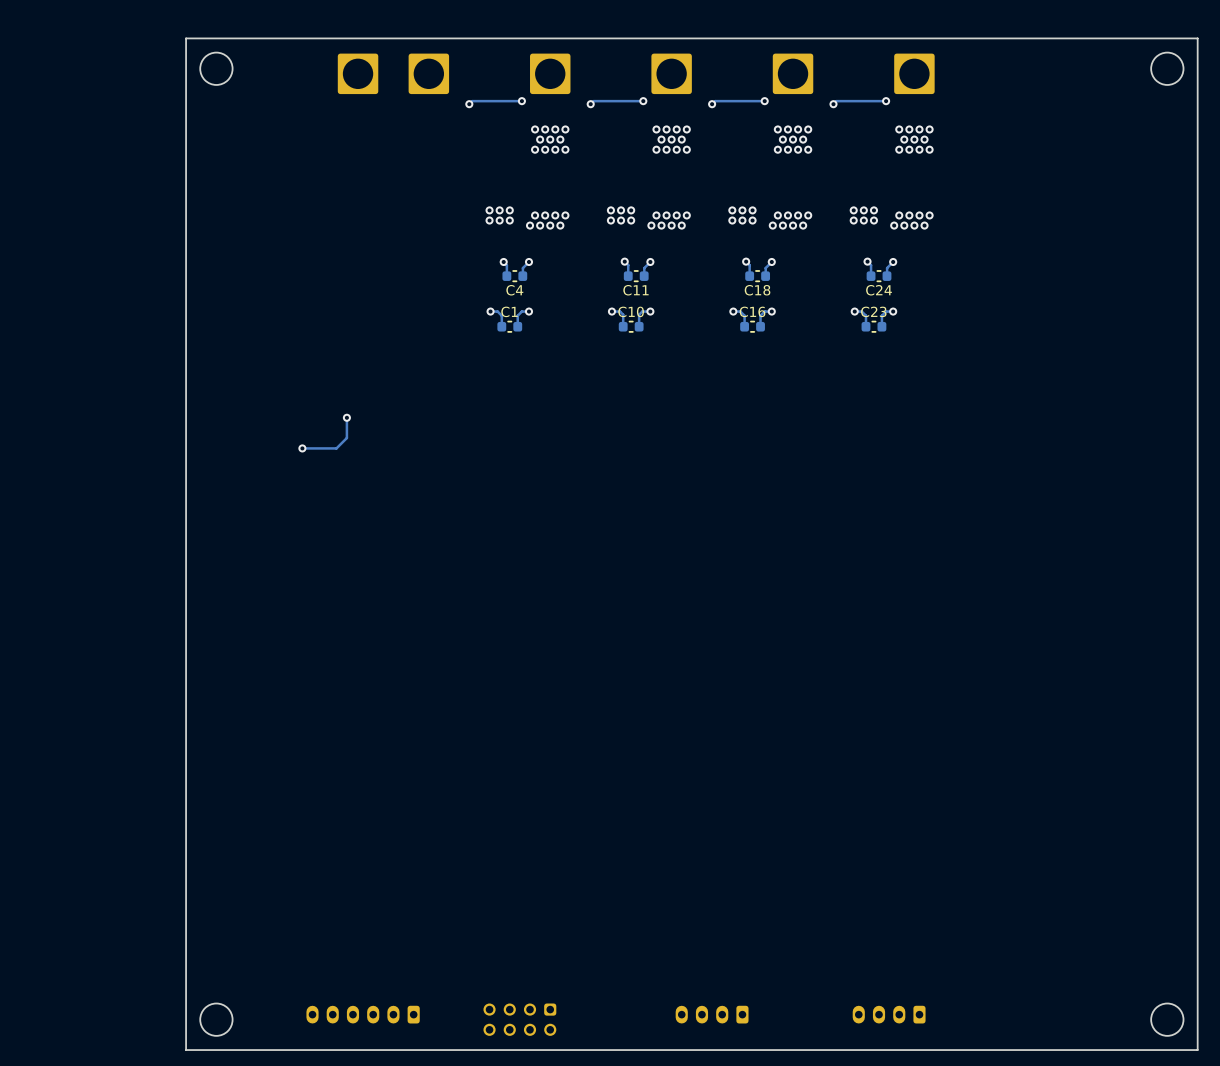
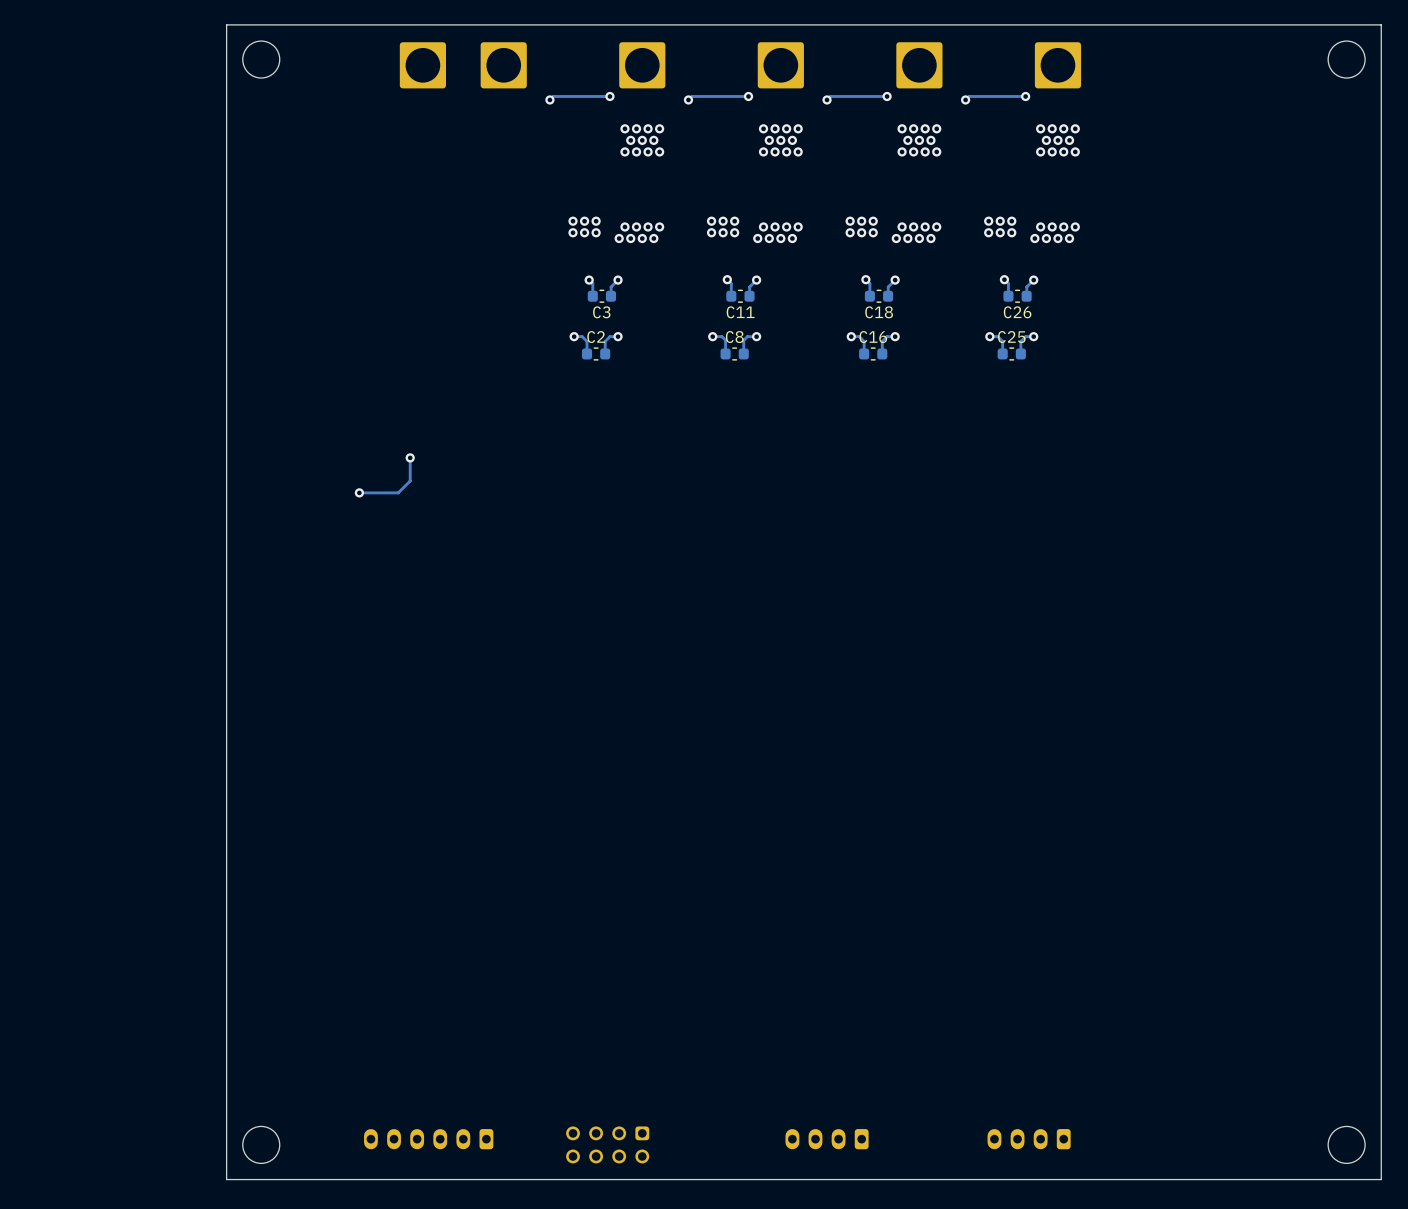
C4 name: C4 (514, 290) -> C3 (601, 312)
C24 name: C24 (879, 290) -> C26 (1017, 312)
C1 name: C1 (509, 311) -> C2 (596, 337)
C10 name: C10 (631, 311) -> C8 (734, 337)
C23 name: C23 (873, 311) -> C25 (1011, 337)

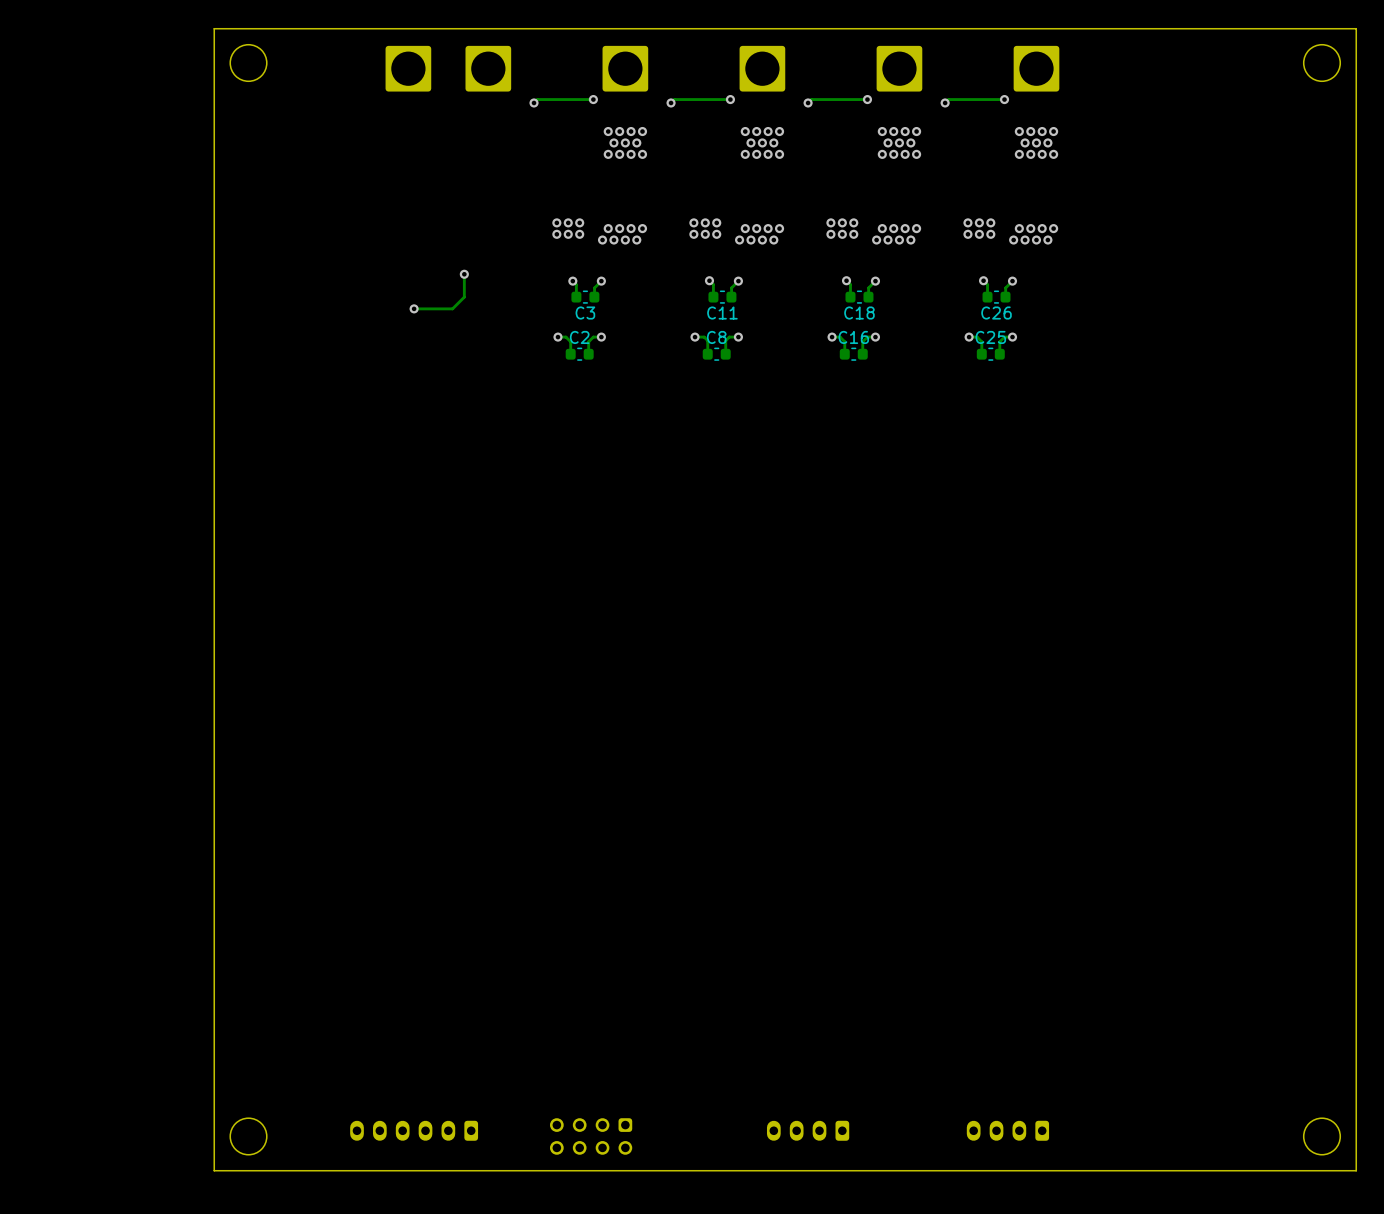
via: none -> (464, 274)
via: none -> (414, 308)
track: (410, 457) (410, 480) (398, 492) (359, 492) -> (464, 274) (464, 297) (452, 308) (414, 308)
via: (410, 457) -> none
via: (359, 492) -> none

